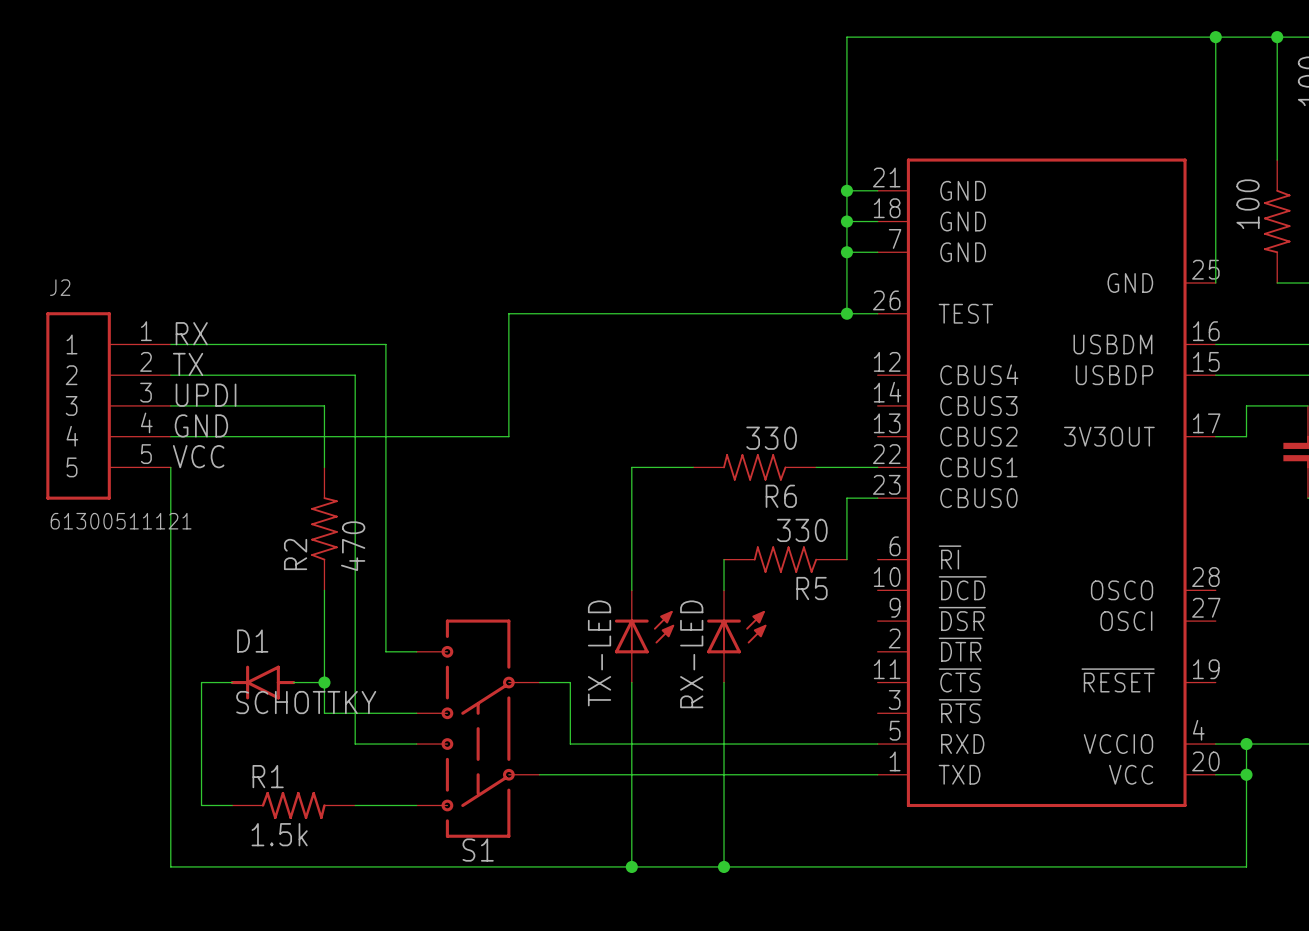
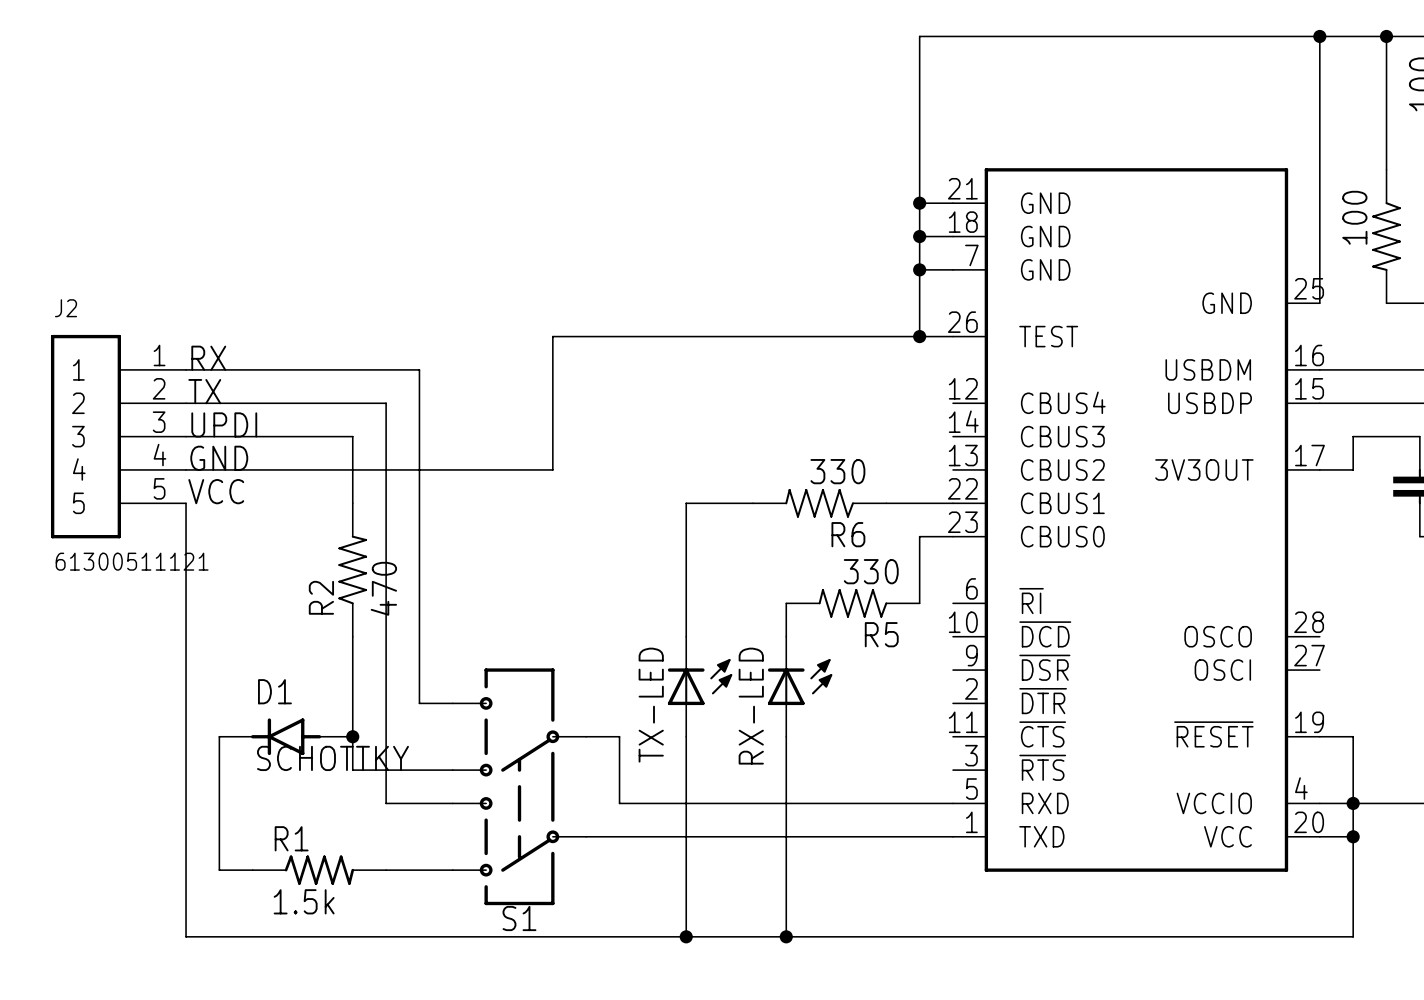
wire: none -> (1319, 736) (1353, 736) (1353, 803)

